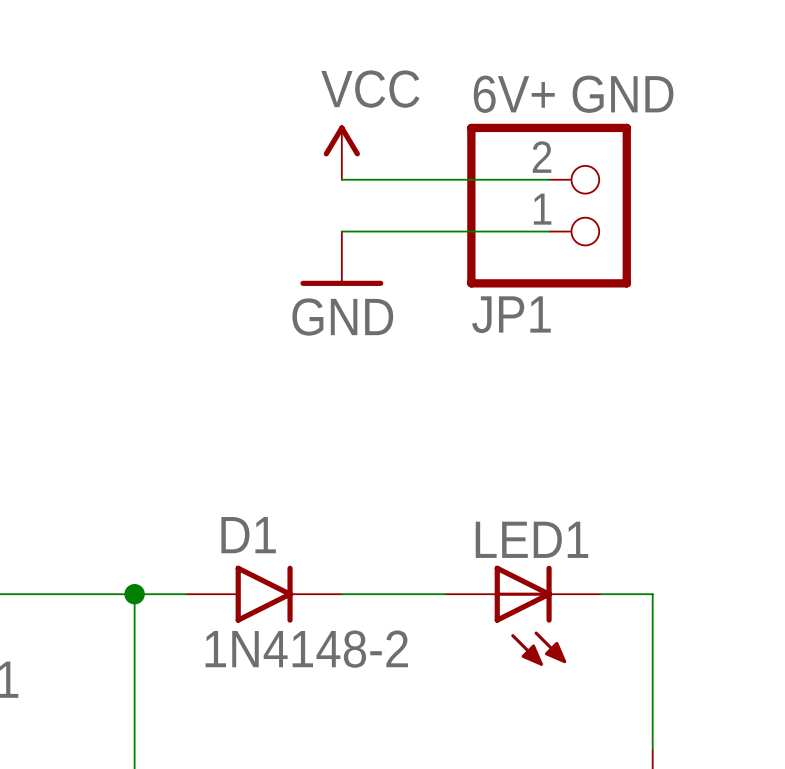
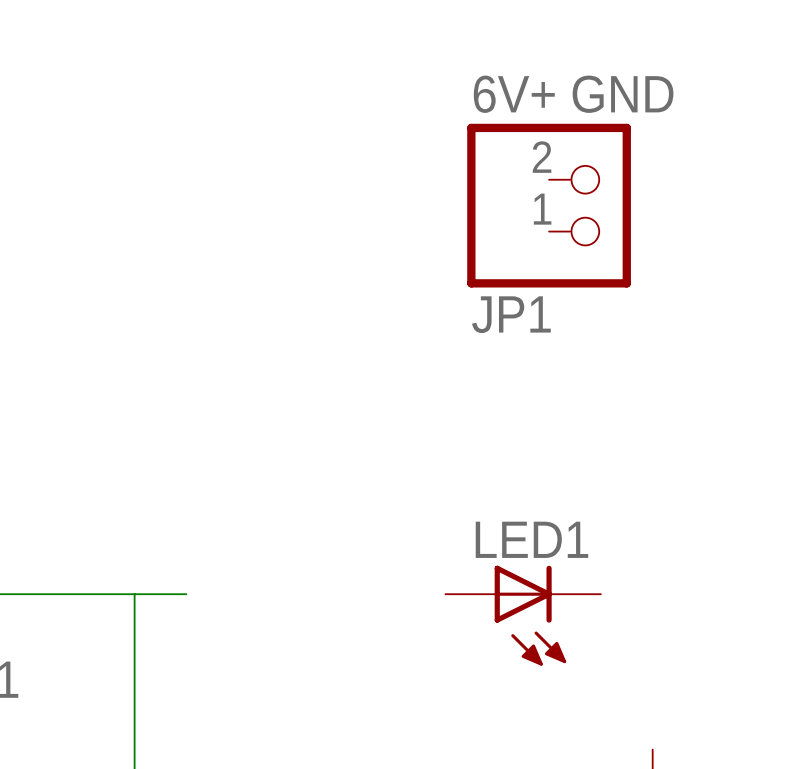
power symbol: VCC (341, 152) -> none
wire: (341, 179) (549, 179) -> none
wire: (341, 231) (549, 231) -> none
power symbol: GND (341, 258) -> none
junction: (134, 594) -> none
D1: 1N4148-2 (264, 594) -> none
wire: (341, 594) (445, 594) -> none
wire: (600, 594) (652, 594) (652, 749) -> none

